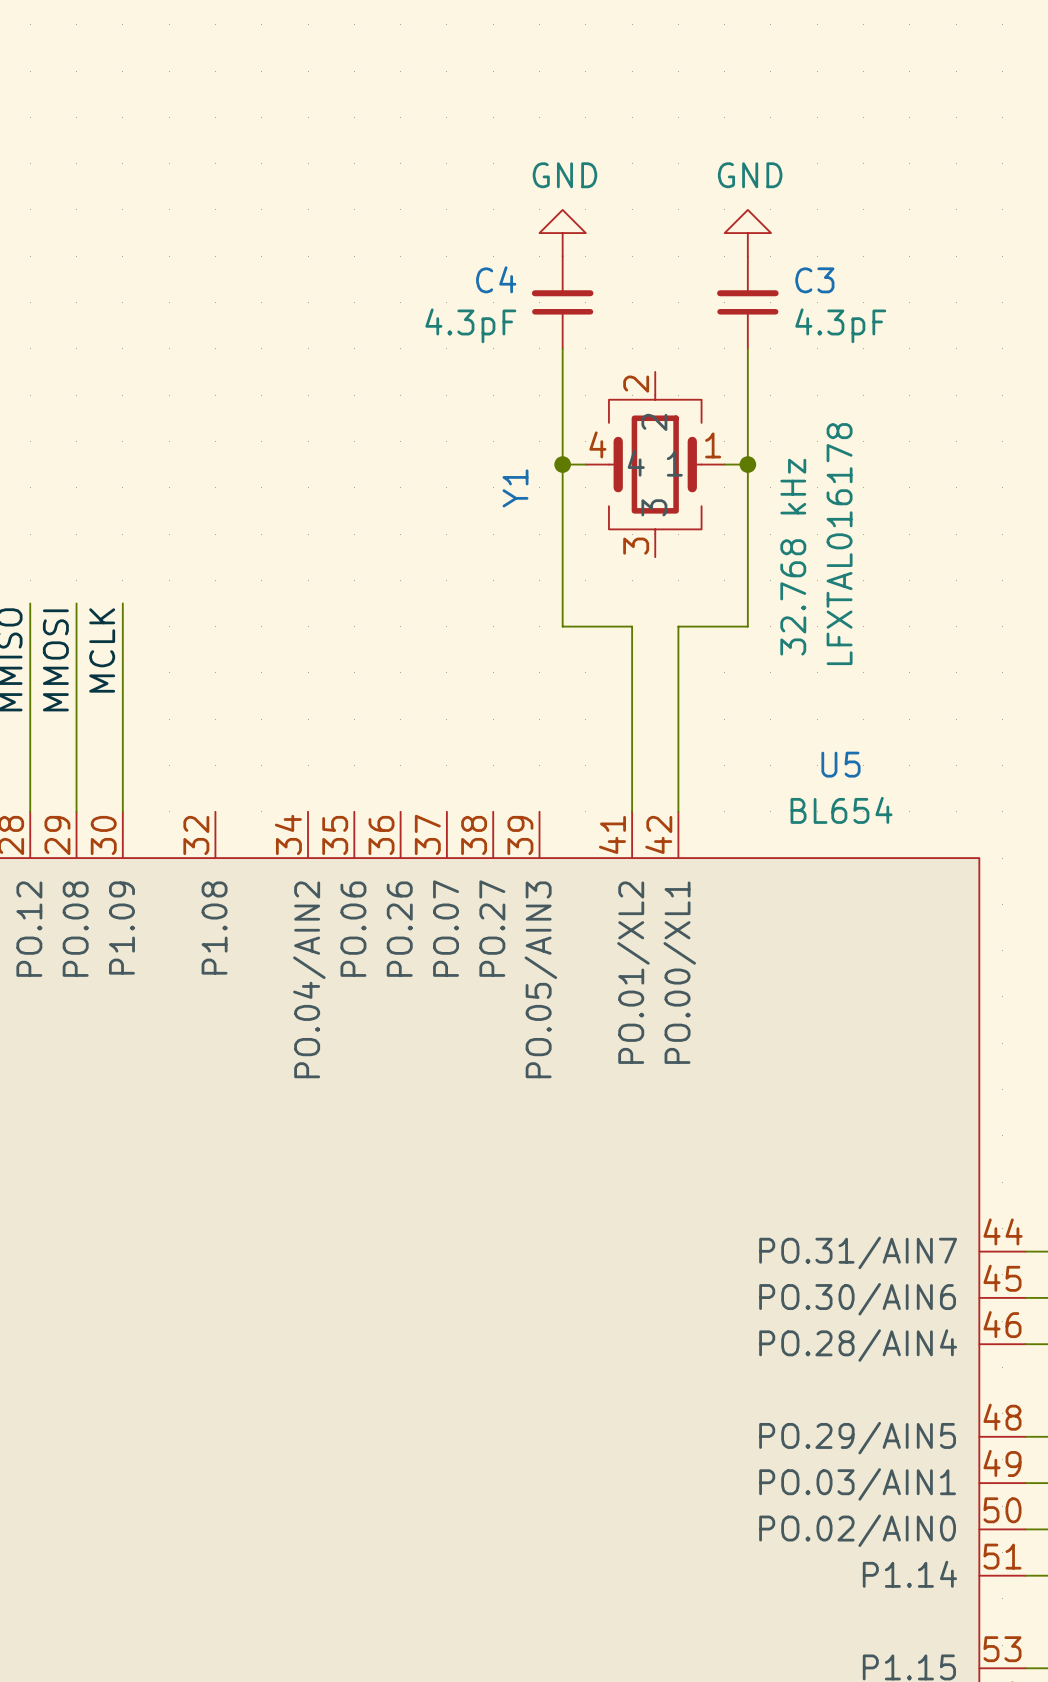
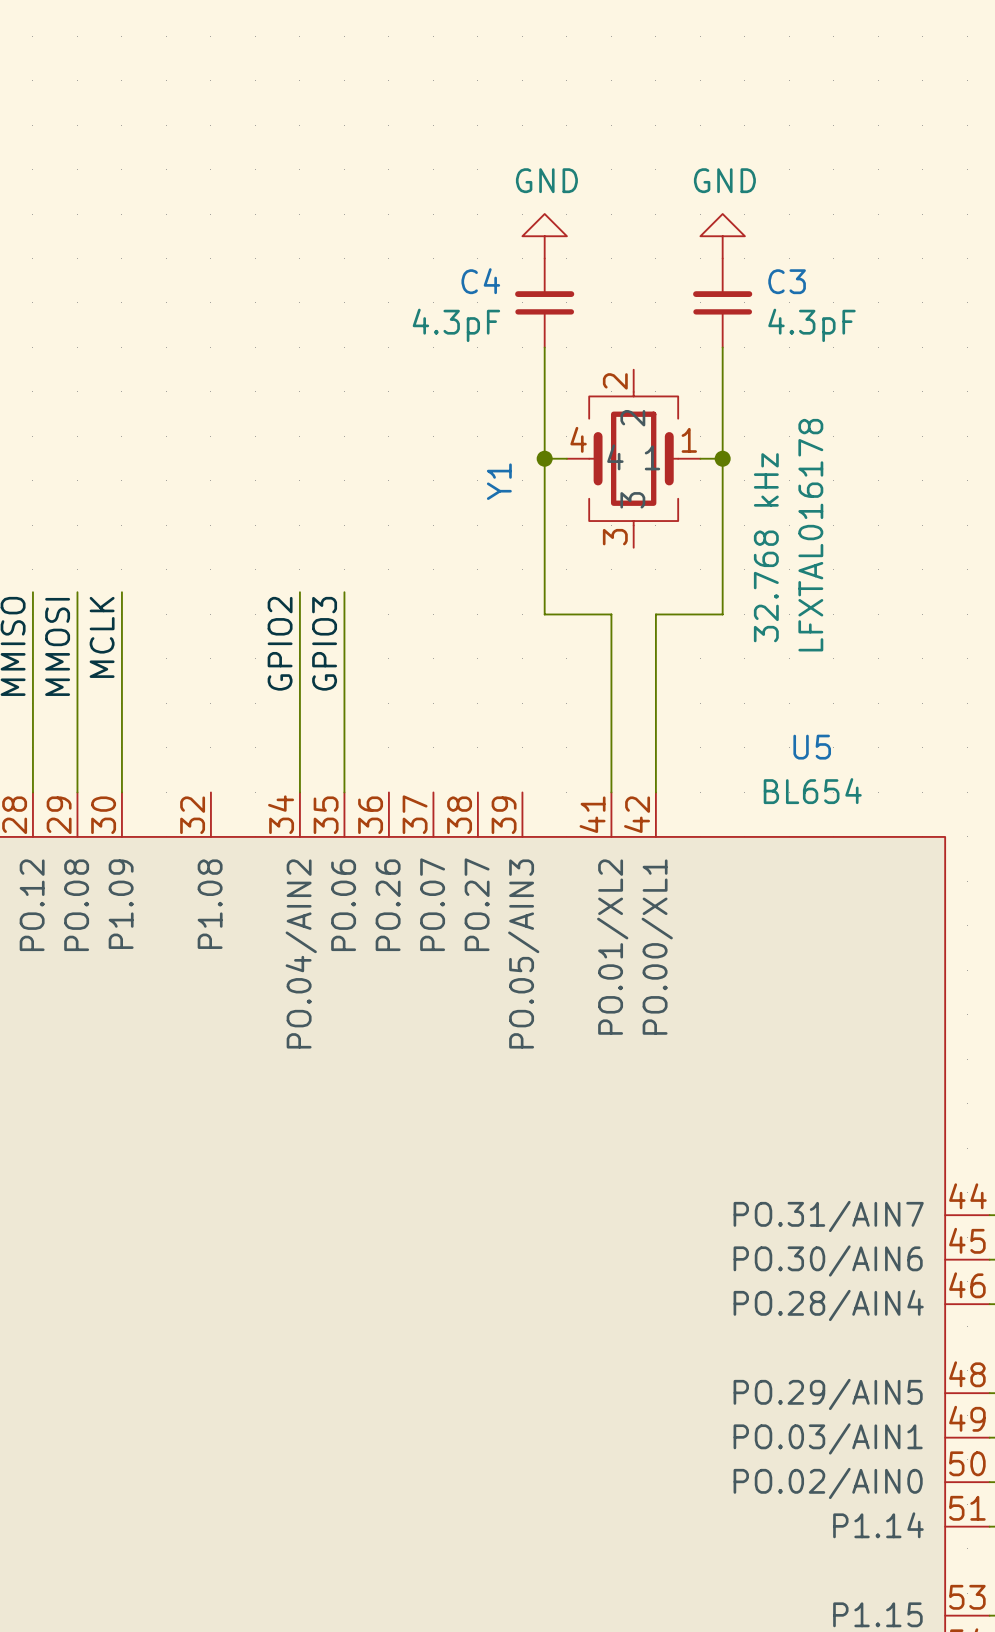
wire: none -> (299, 592) (299, 792)
wire: none -> (344, 592) (344, 792)
label: none -> GPIO2 (280, 643)
label: none -> GPIO3 (324, 643)

